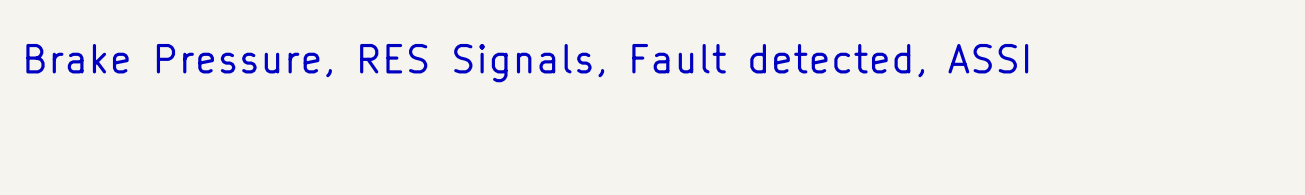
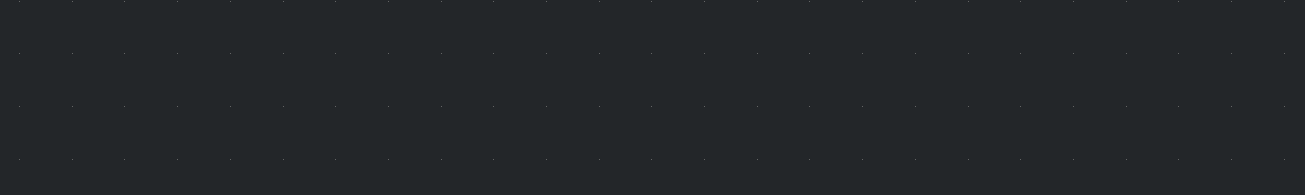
text: Brake Pressure, RES Signals, Fault detected, ASSI (527, 63) -> none

